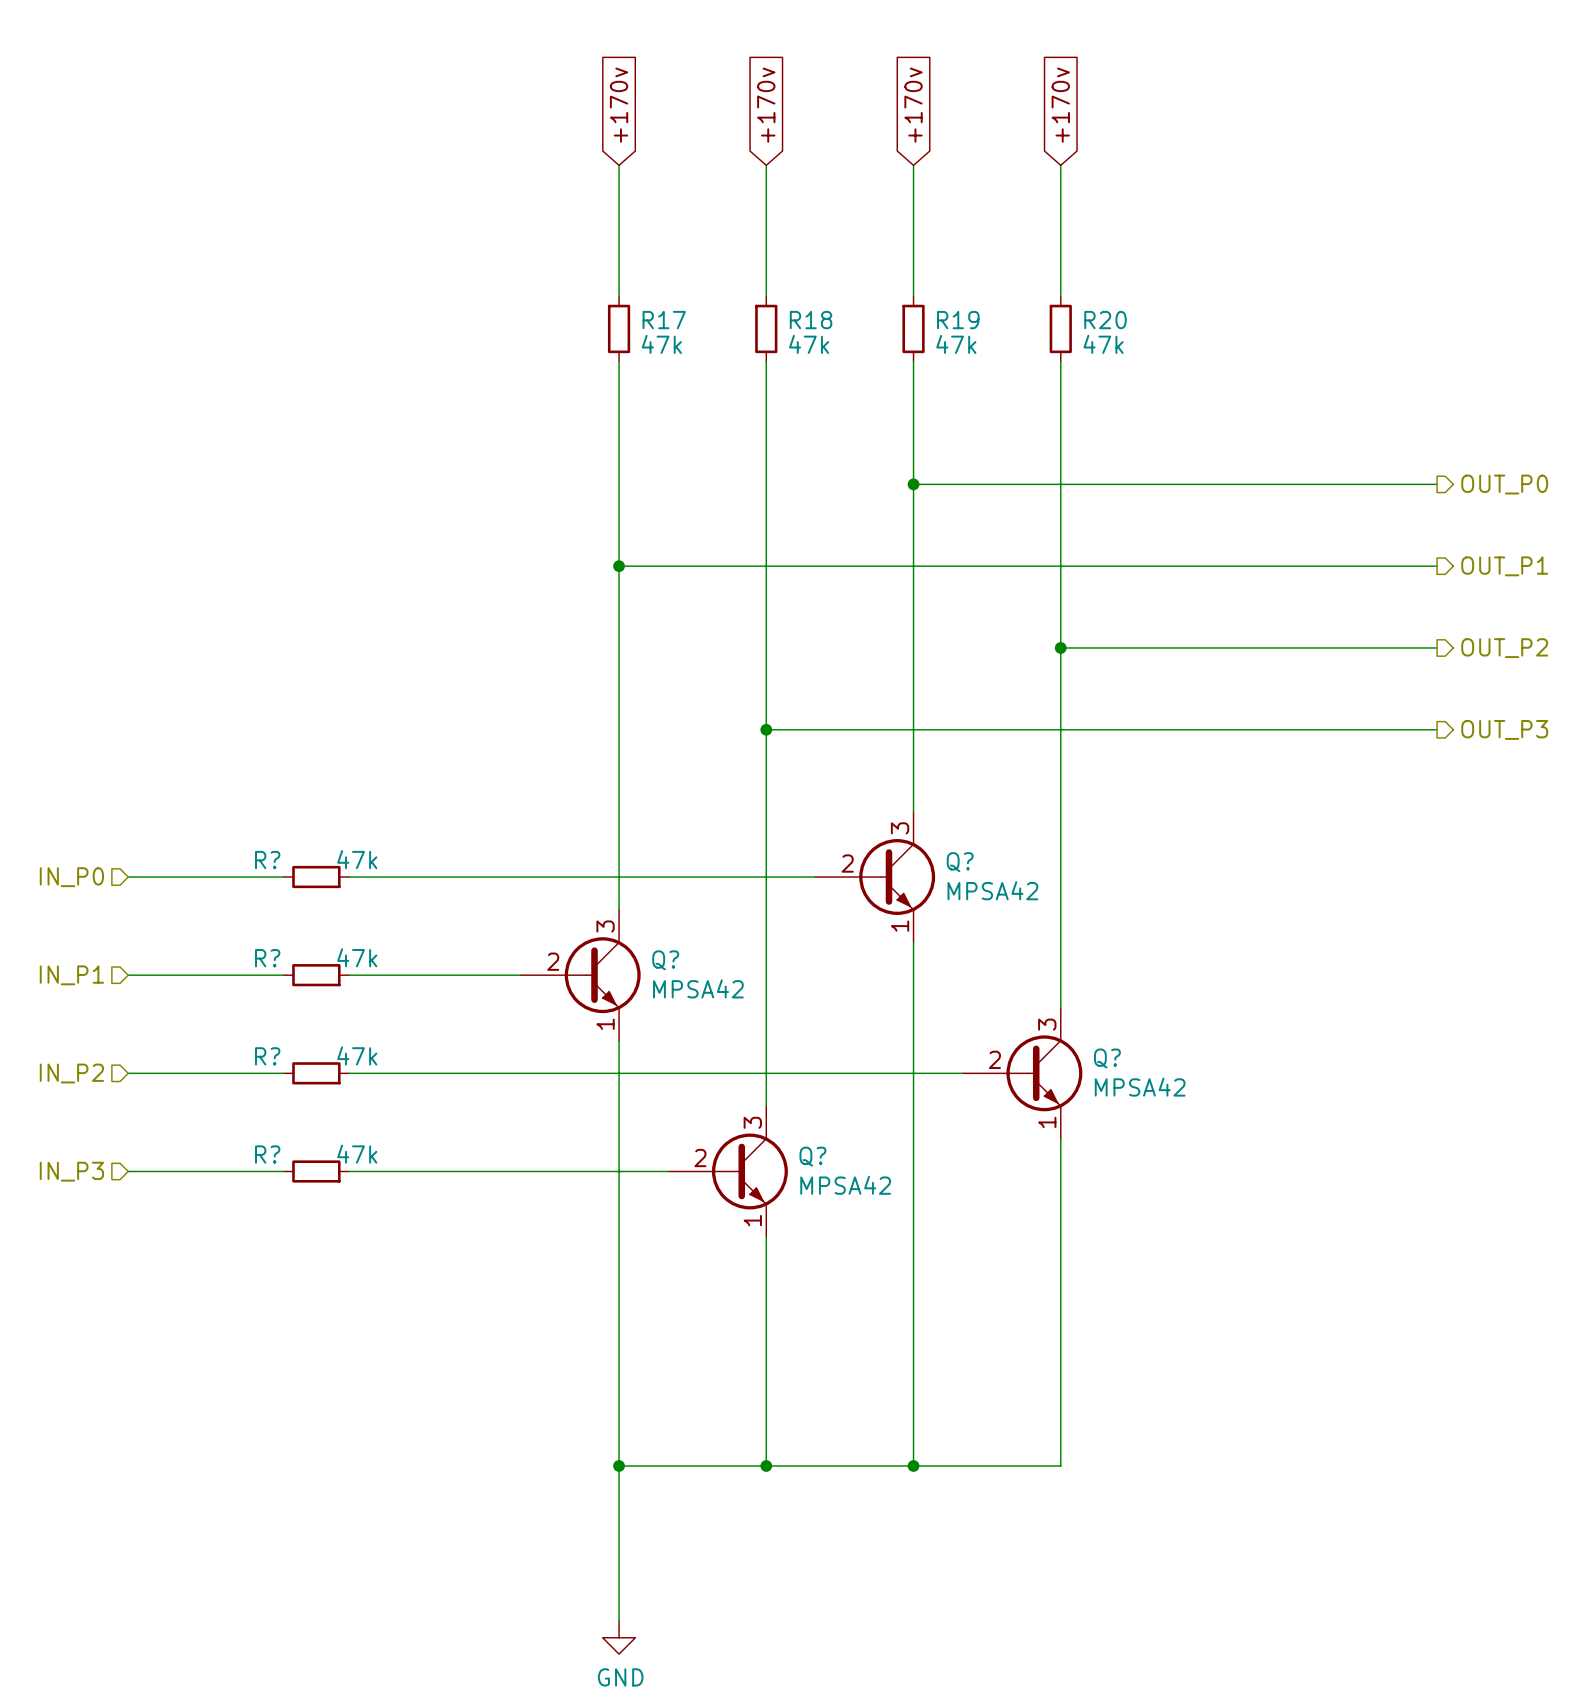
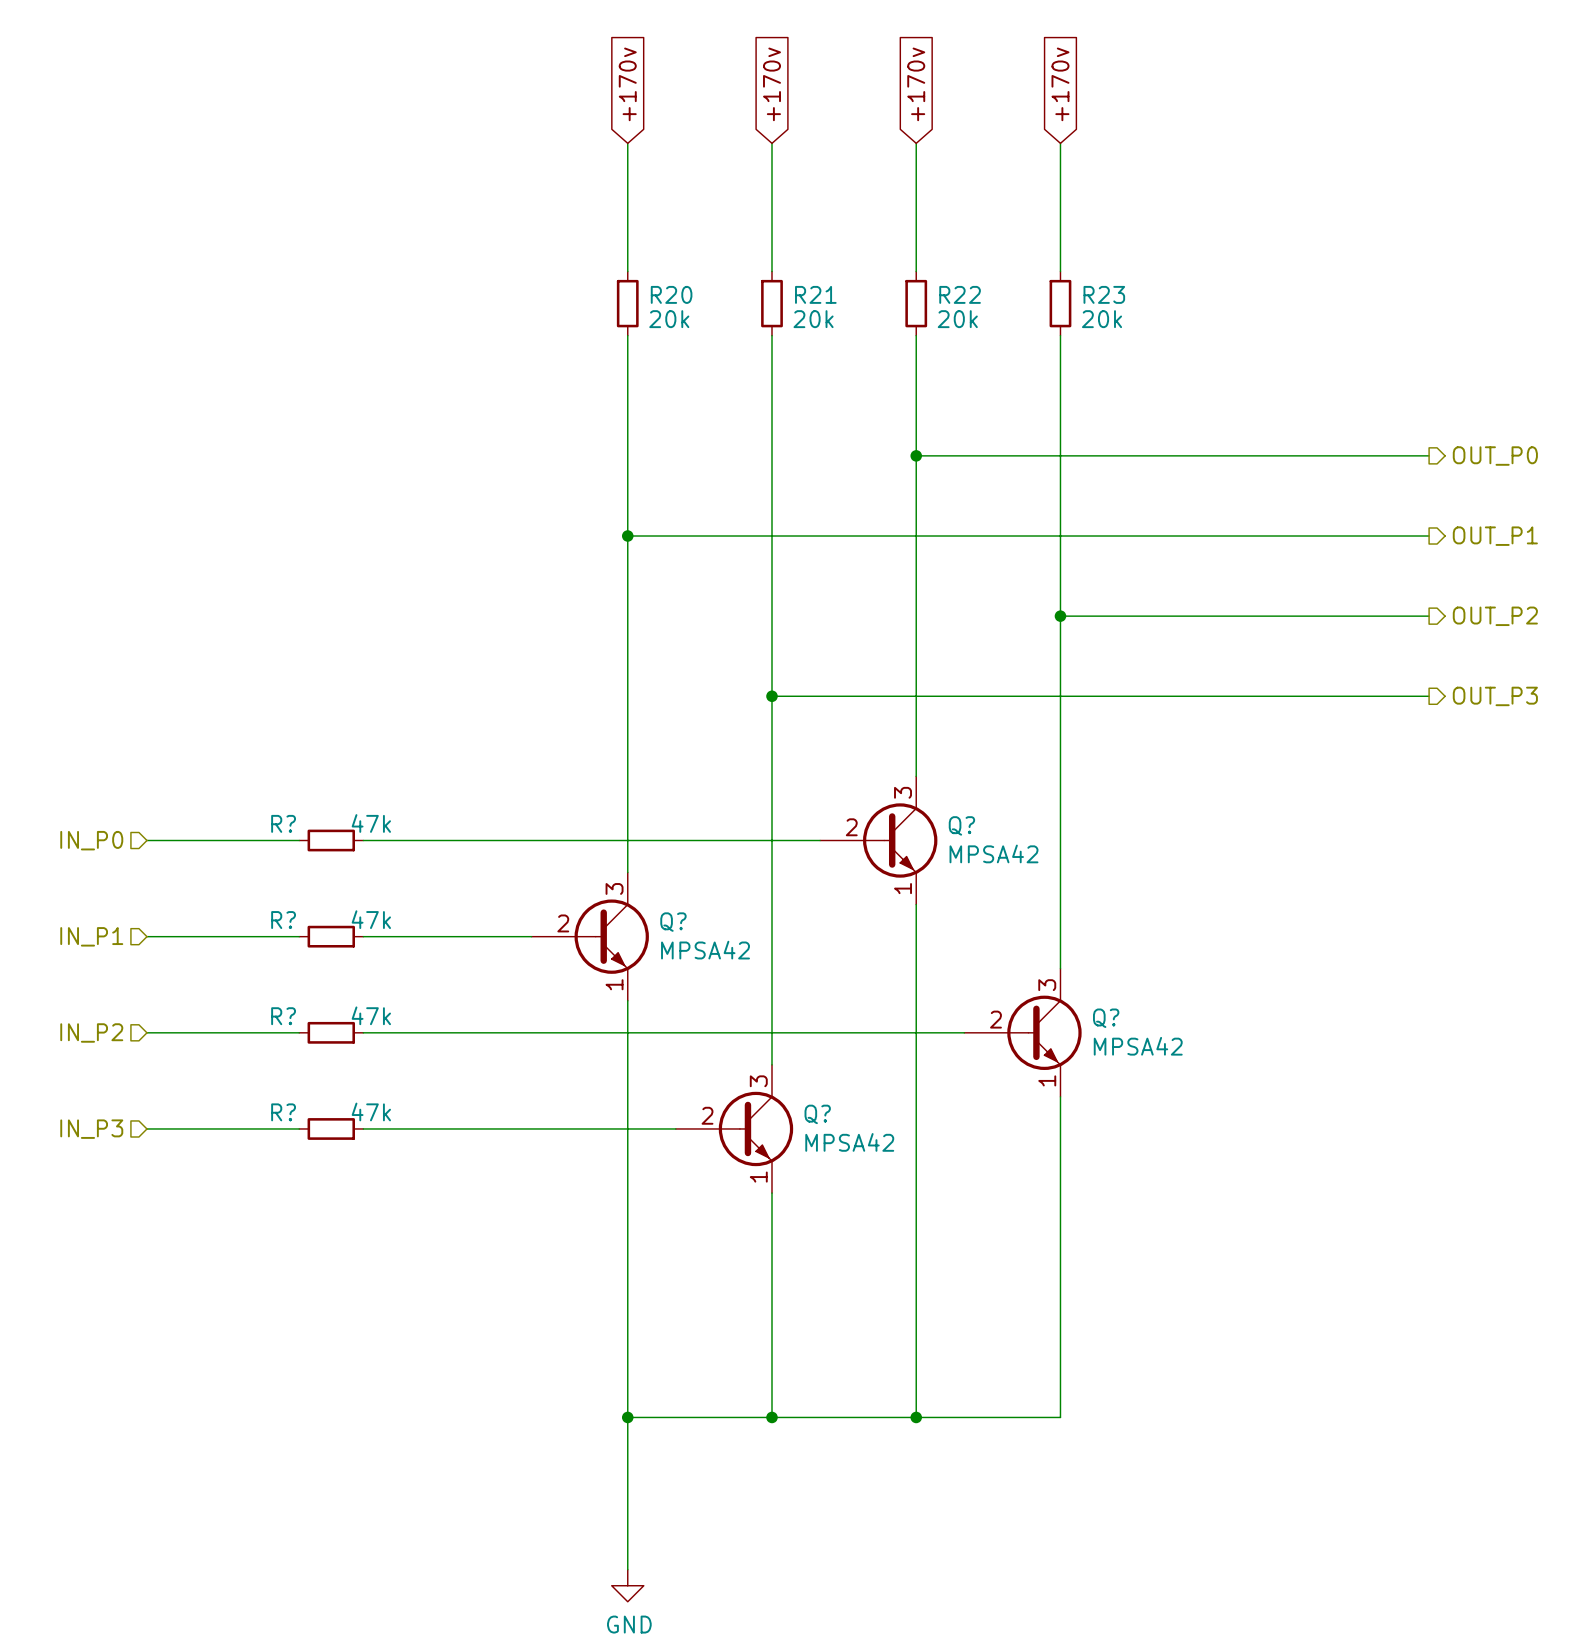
R17 name: R17 (664, 320) -> R20 (671, 294)
R18 name: R18 (811, 320) -> R21 (815, 294)
R19 name: R19 (958, 320) -> R22 (960, 294)
R20 name: R20 (1105, 320) -> R23 (1104, 294)
R17 value: 47k (661, 344) -> 20k (669, 319)
R18 value: 47k (809, 344) -> 20k (813, 319)
R19 value: 47k (956, 344) -> 20k (957, 319)
R20 value: 47k (1103, 344) -> 20k (1102, 319)

